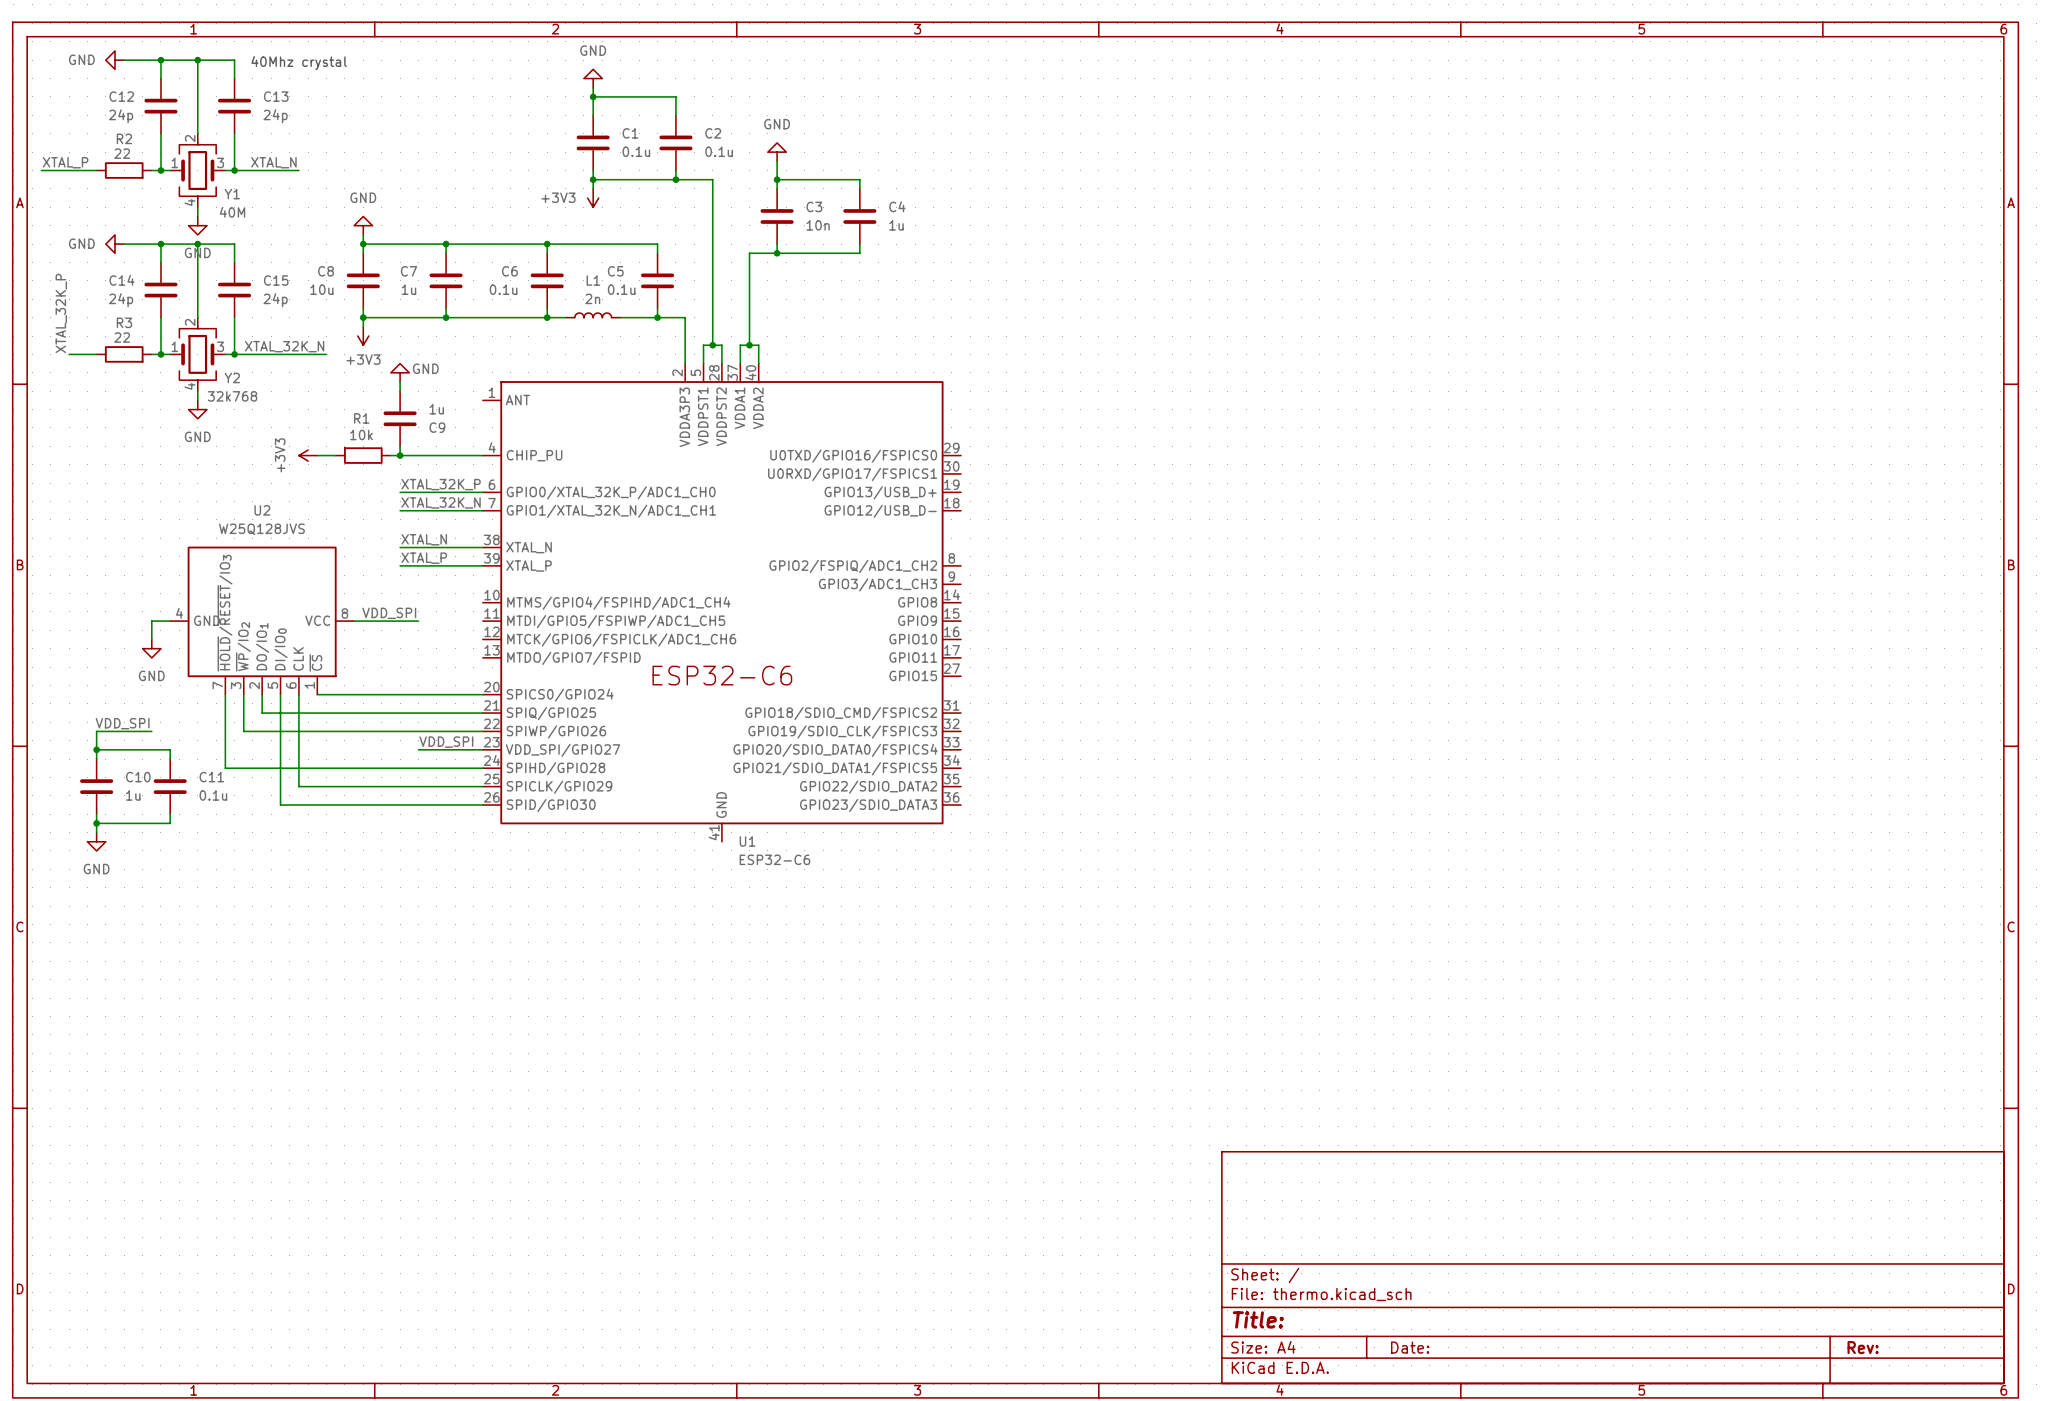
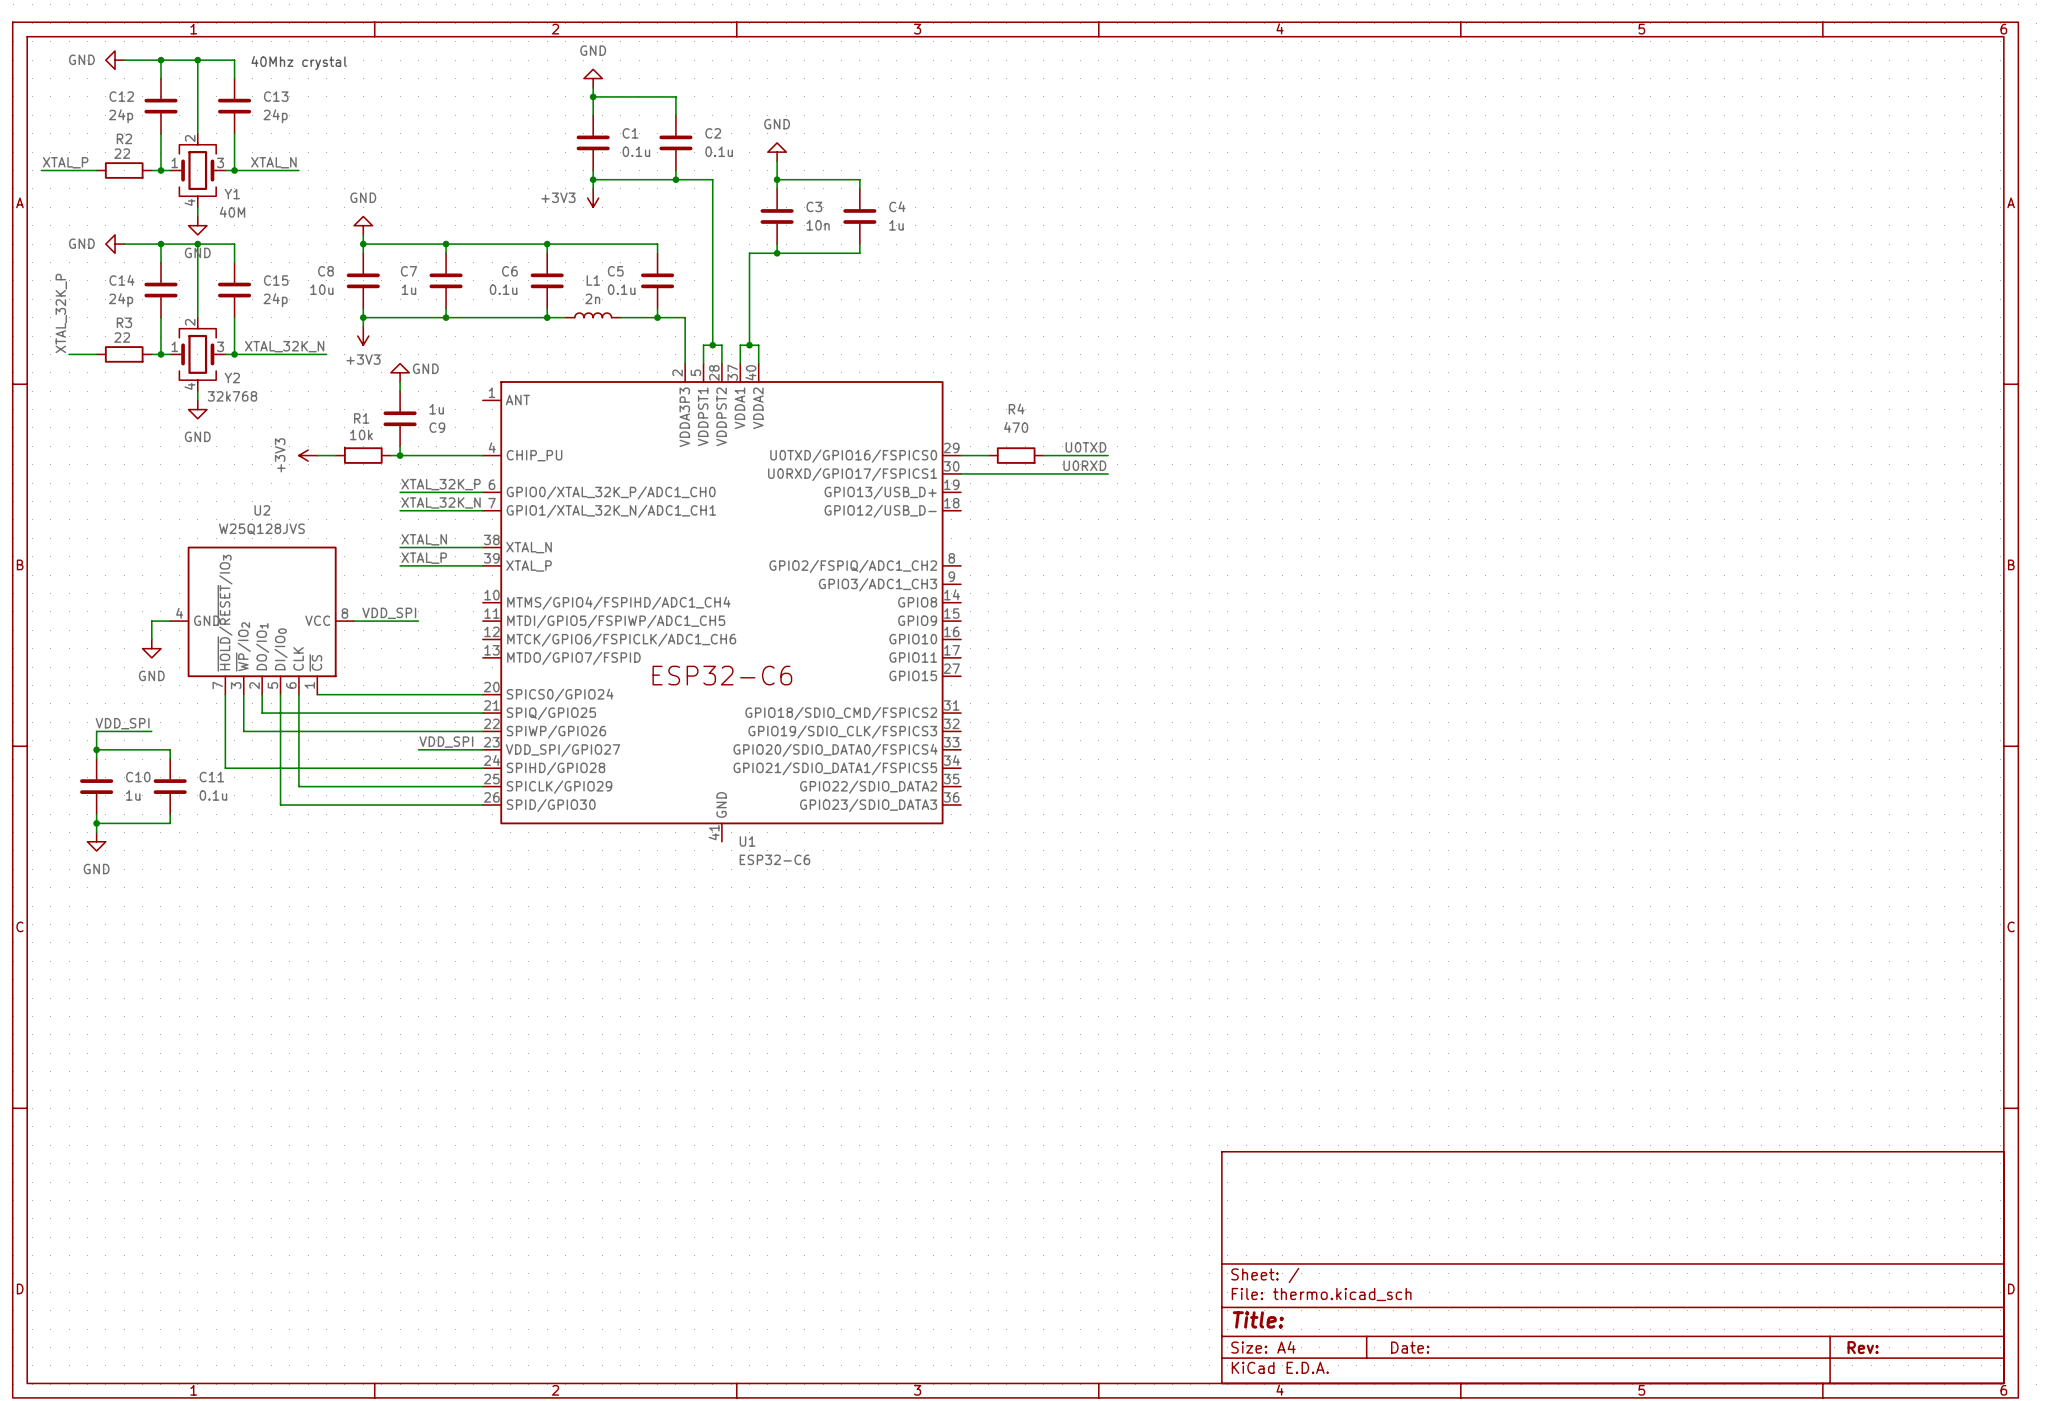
label: none -> U0TXD (1085, 447)
wire: none -> (961, 455) (988, 455)
R4: none -> 470 (1016, 455)
wire: none -> (1043, 455) (1108, 455)
label: none -> U0RXD (1084, 465)
wire: none -> (961, 473) (1108, 473)

